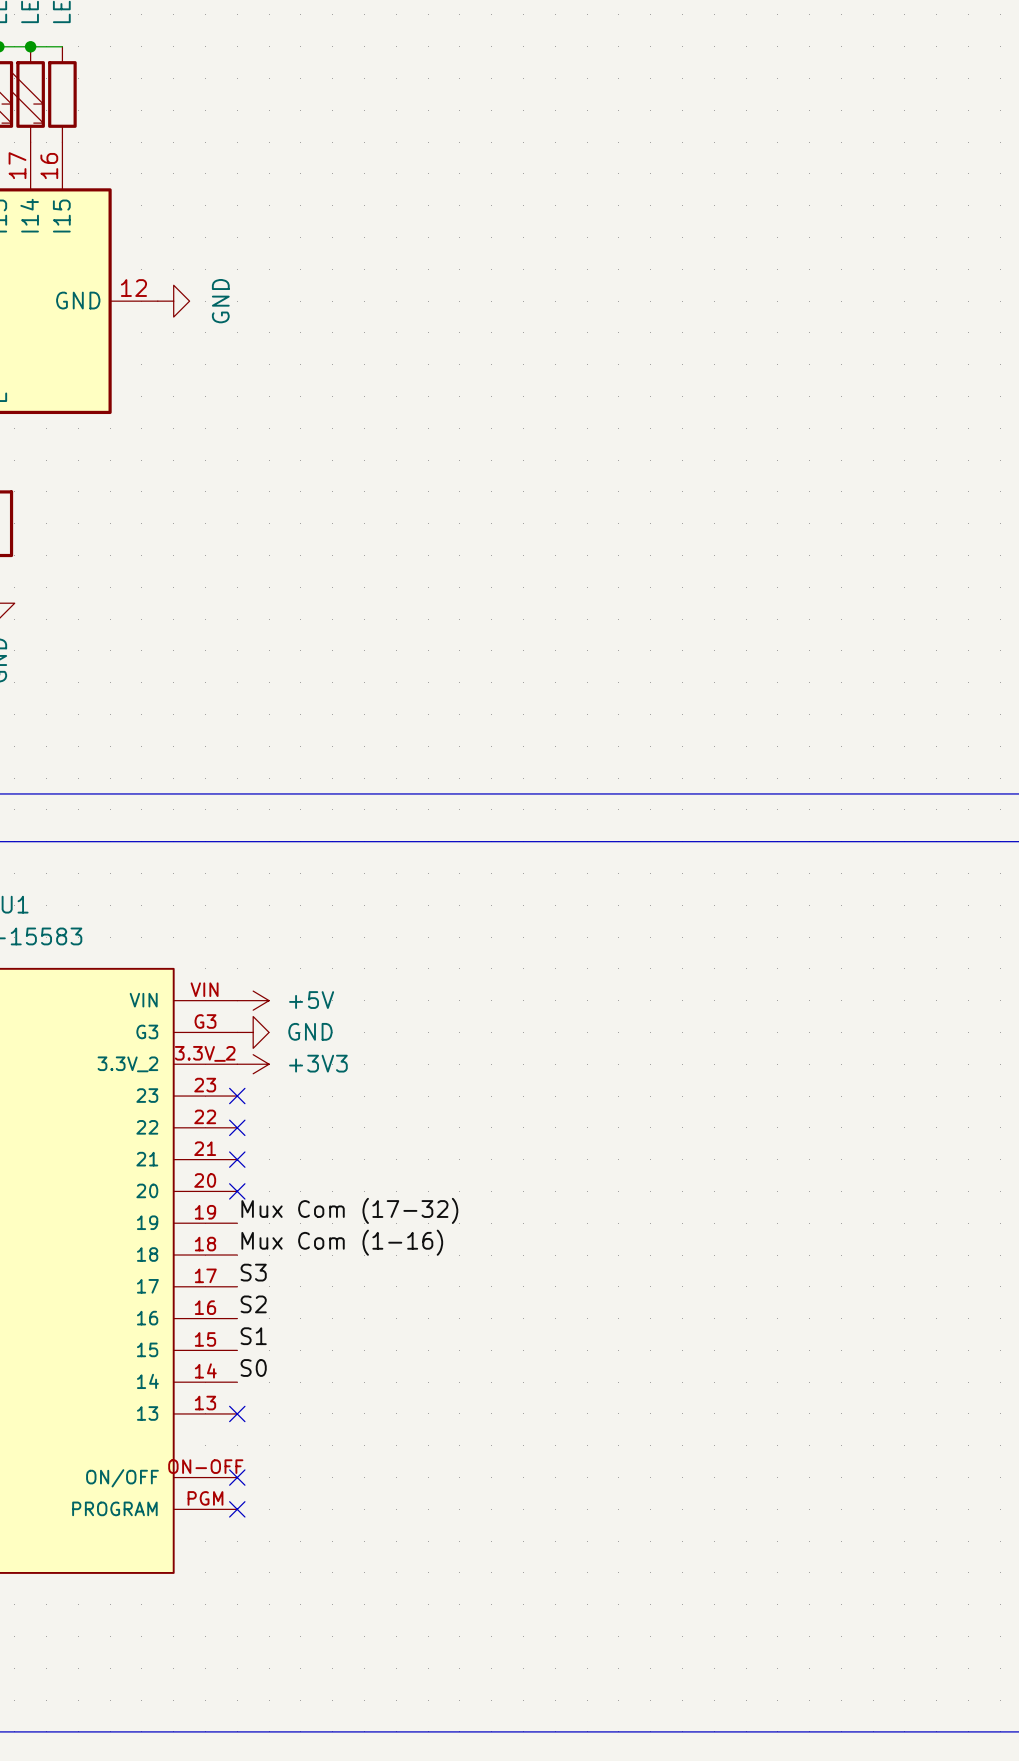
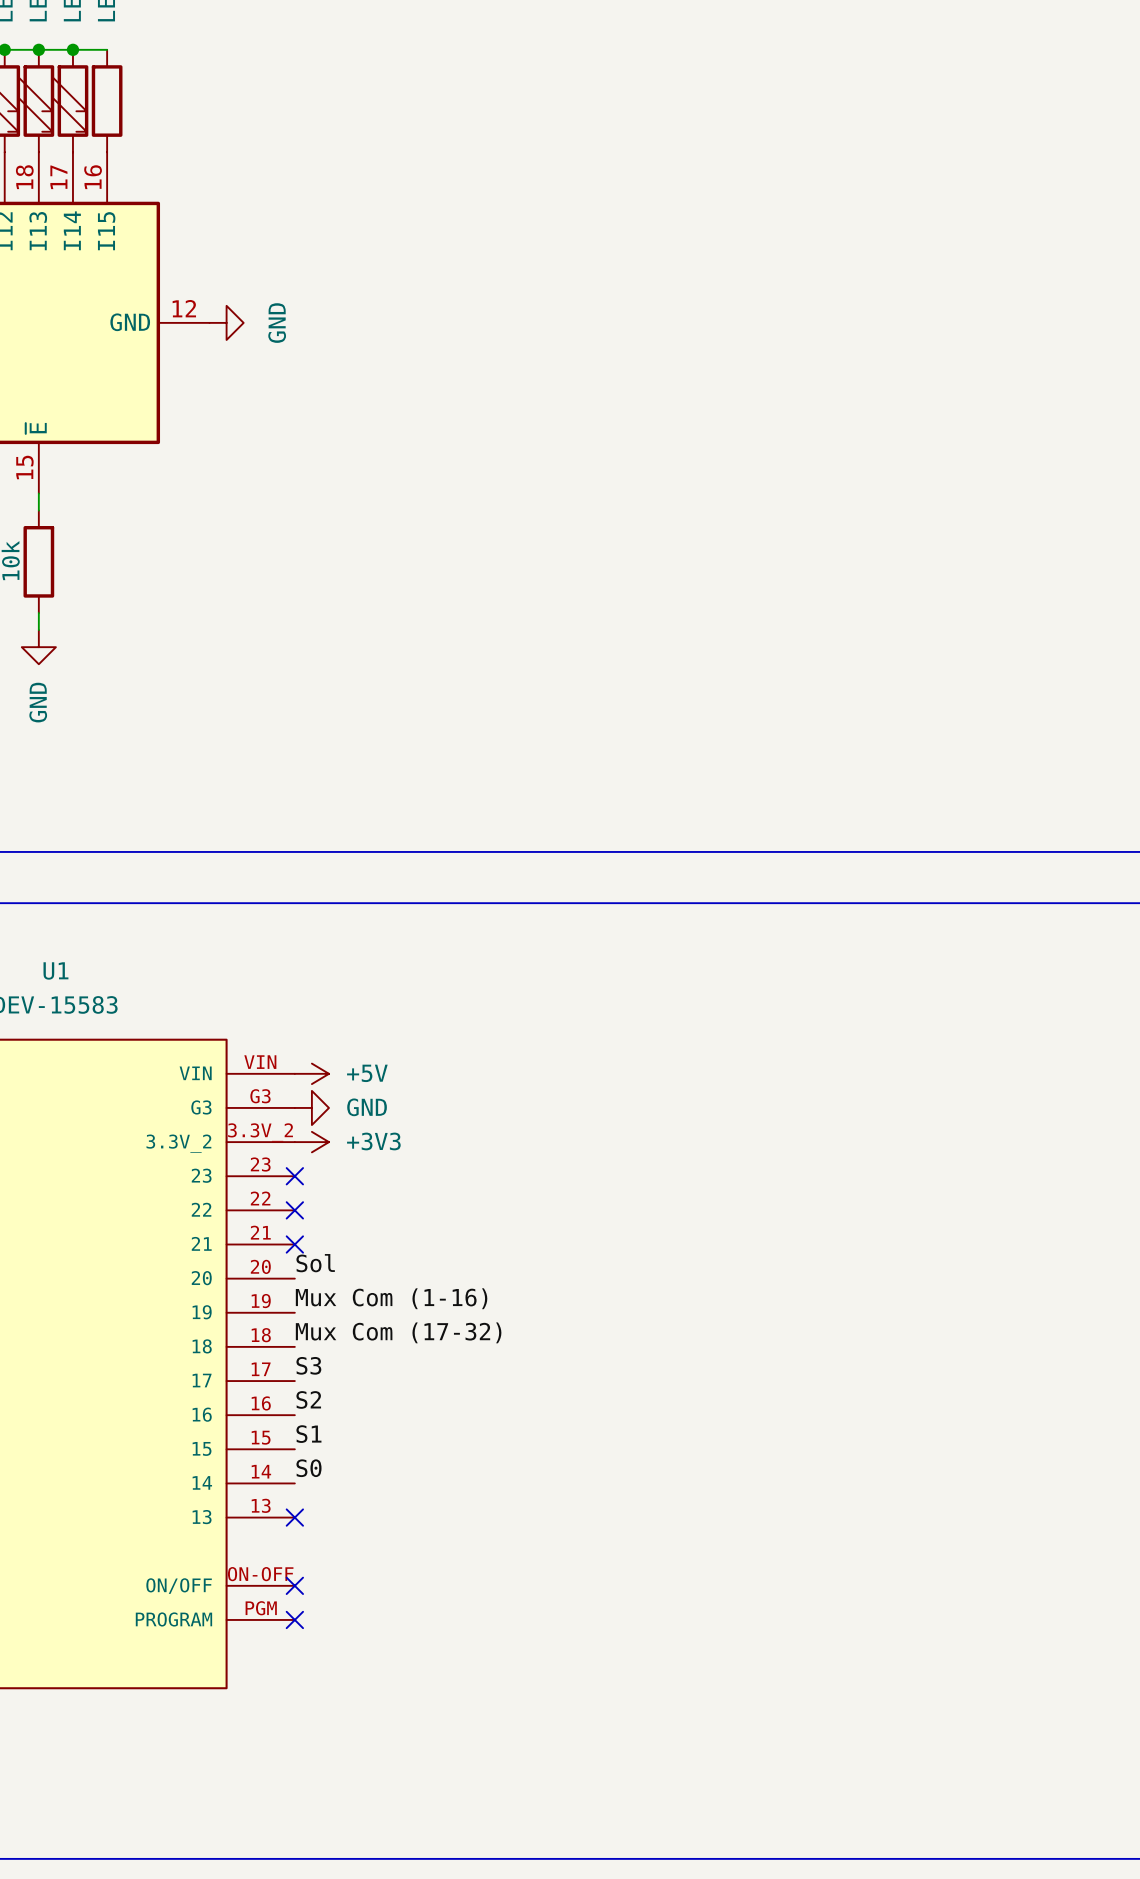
label: none -> Sol (315, 1263)
no-connect mark: (237, 1191) -> none
label: Mux Com (17-32) (349, 1210) -> Mux Com (1-16) (391, 1298)
label: Mux Com (1-16) (342, 1242) -> Mux Com (17-32) (398, 1332)

